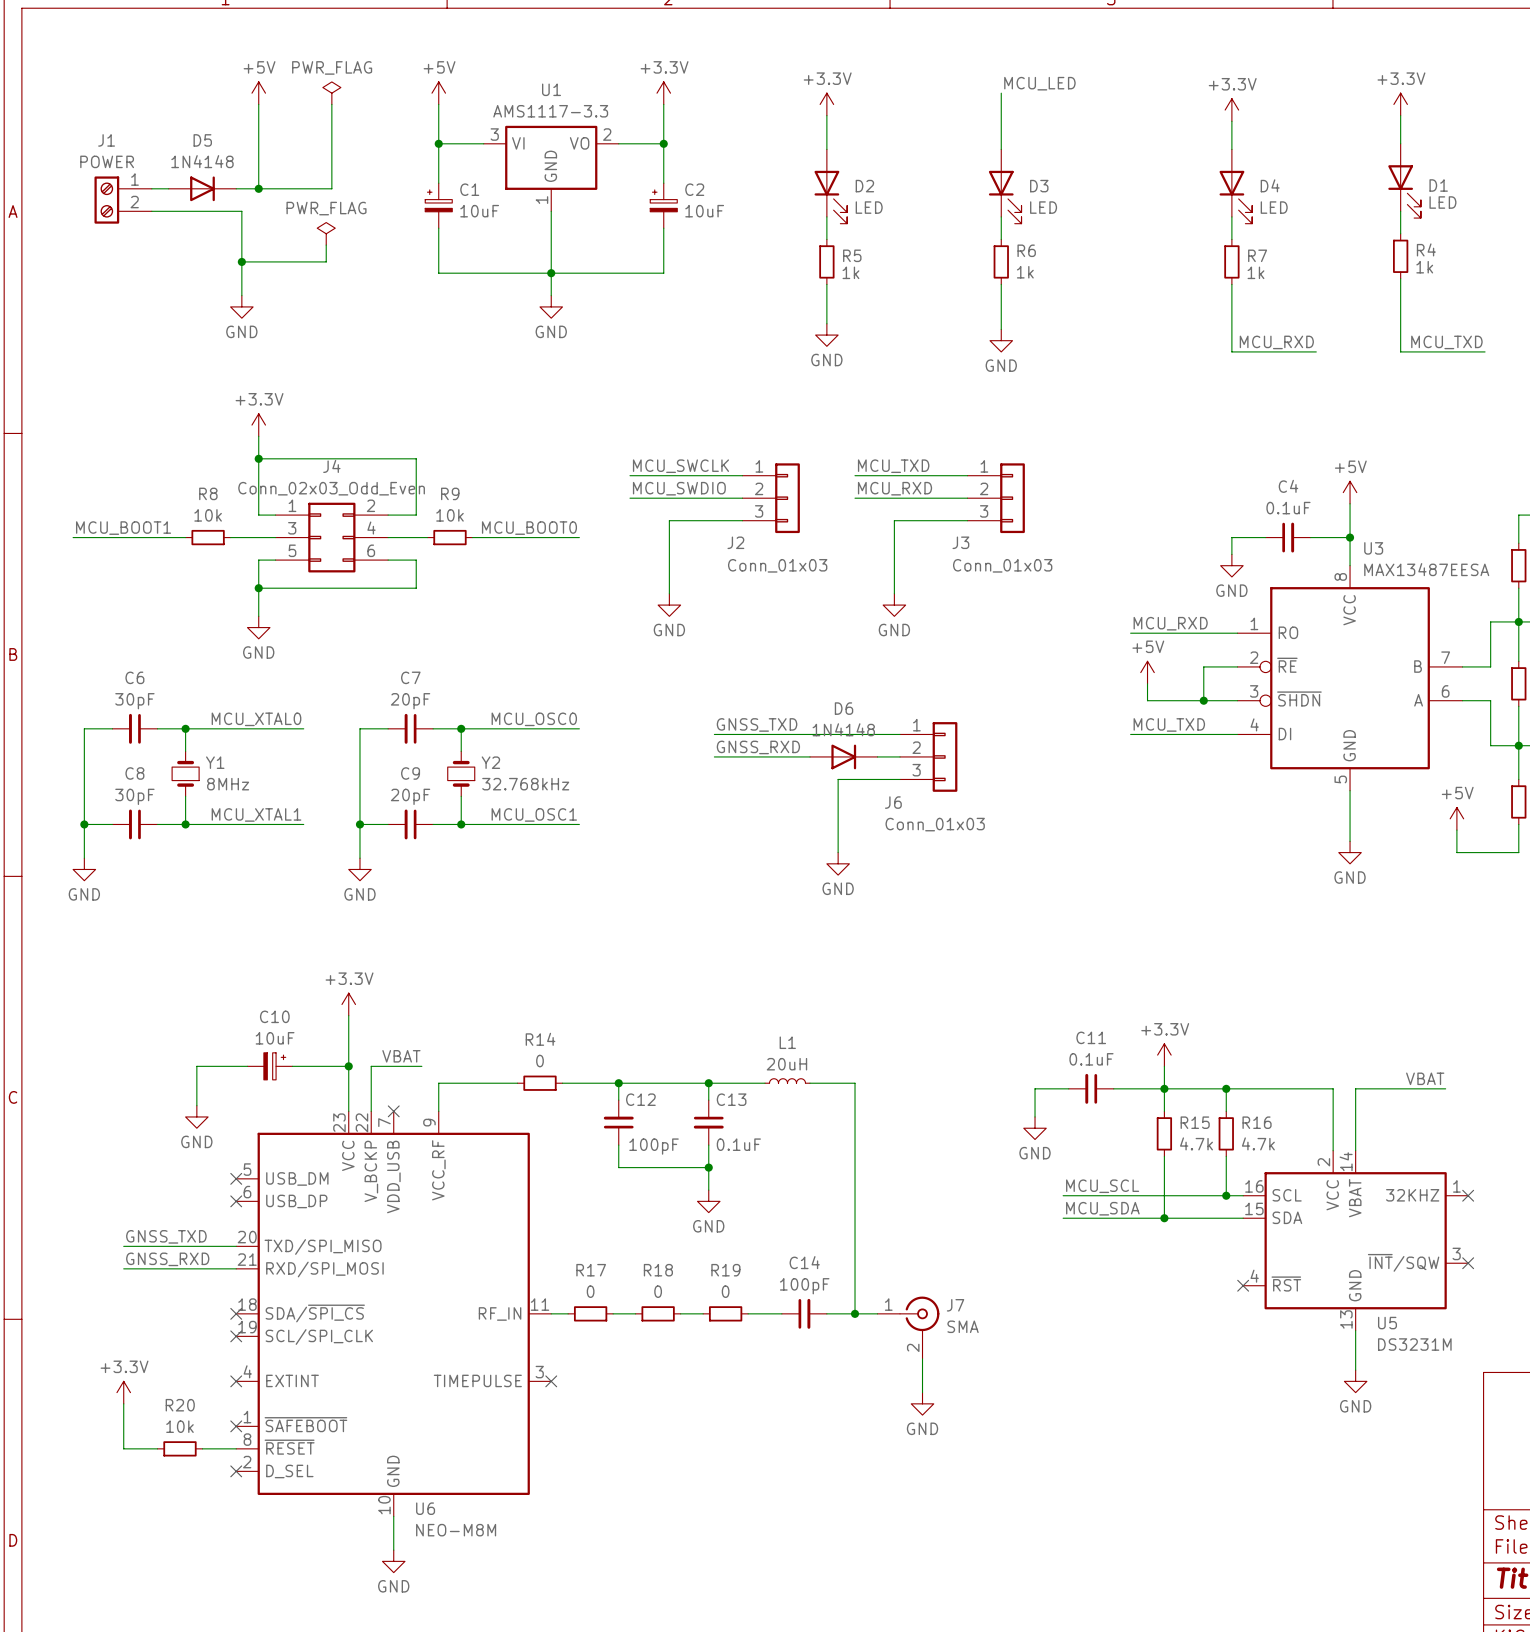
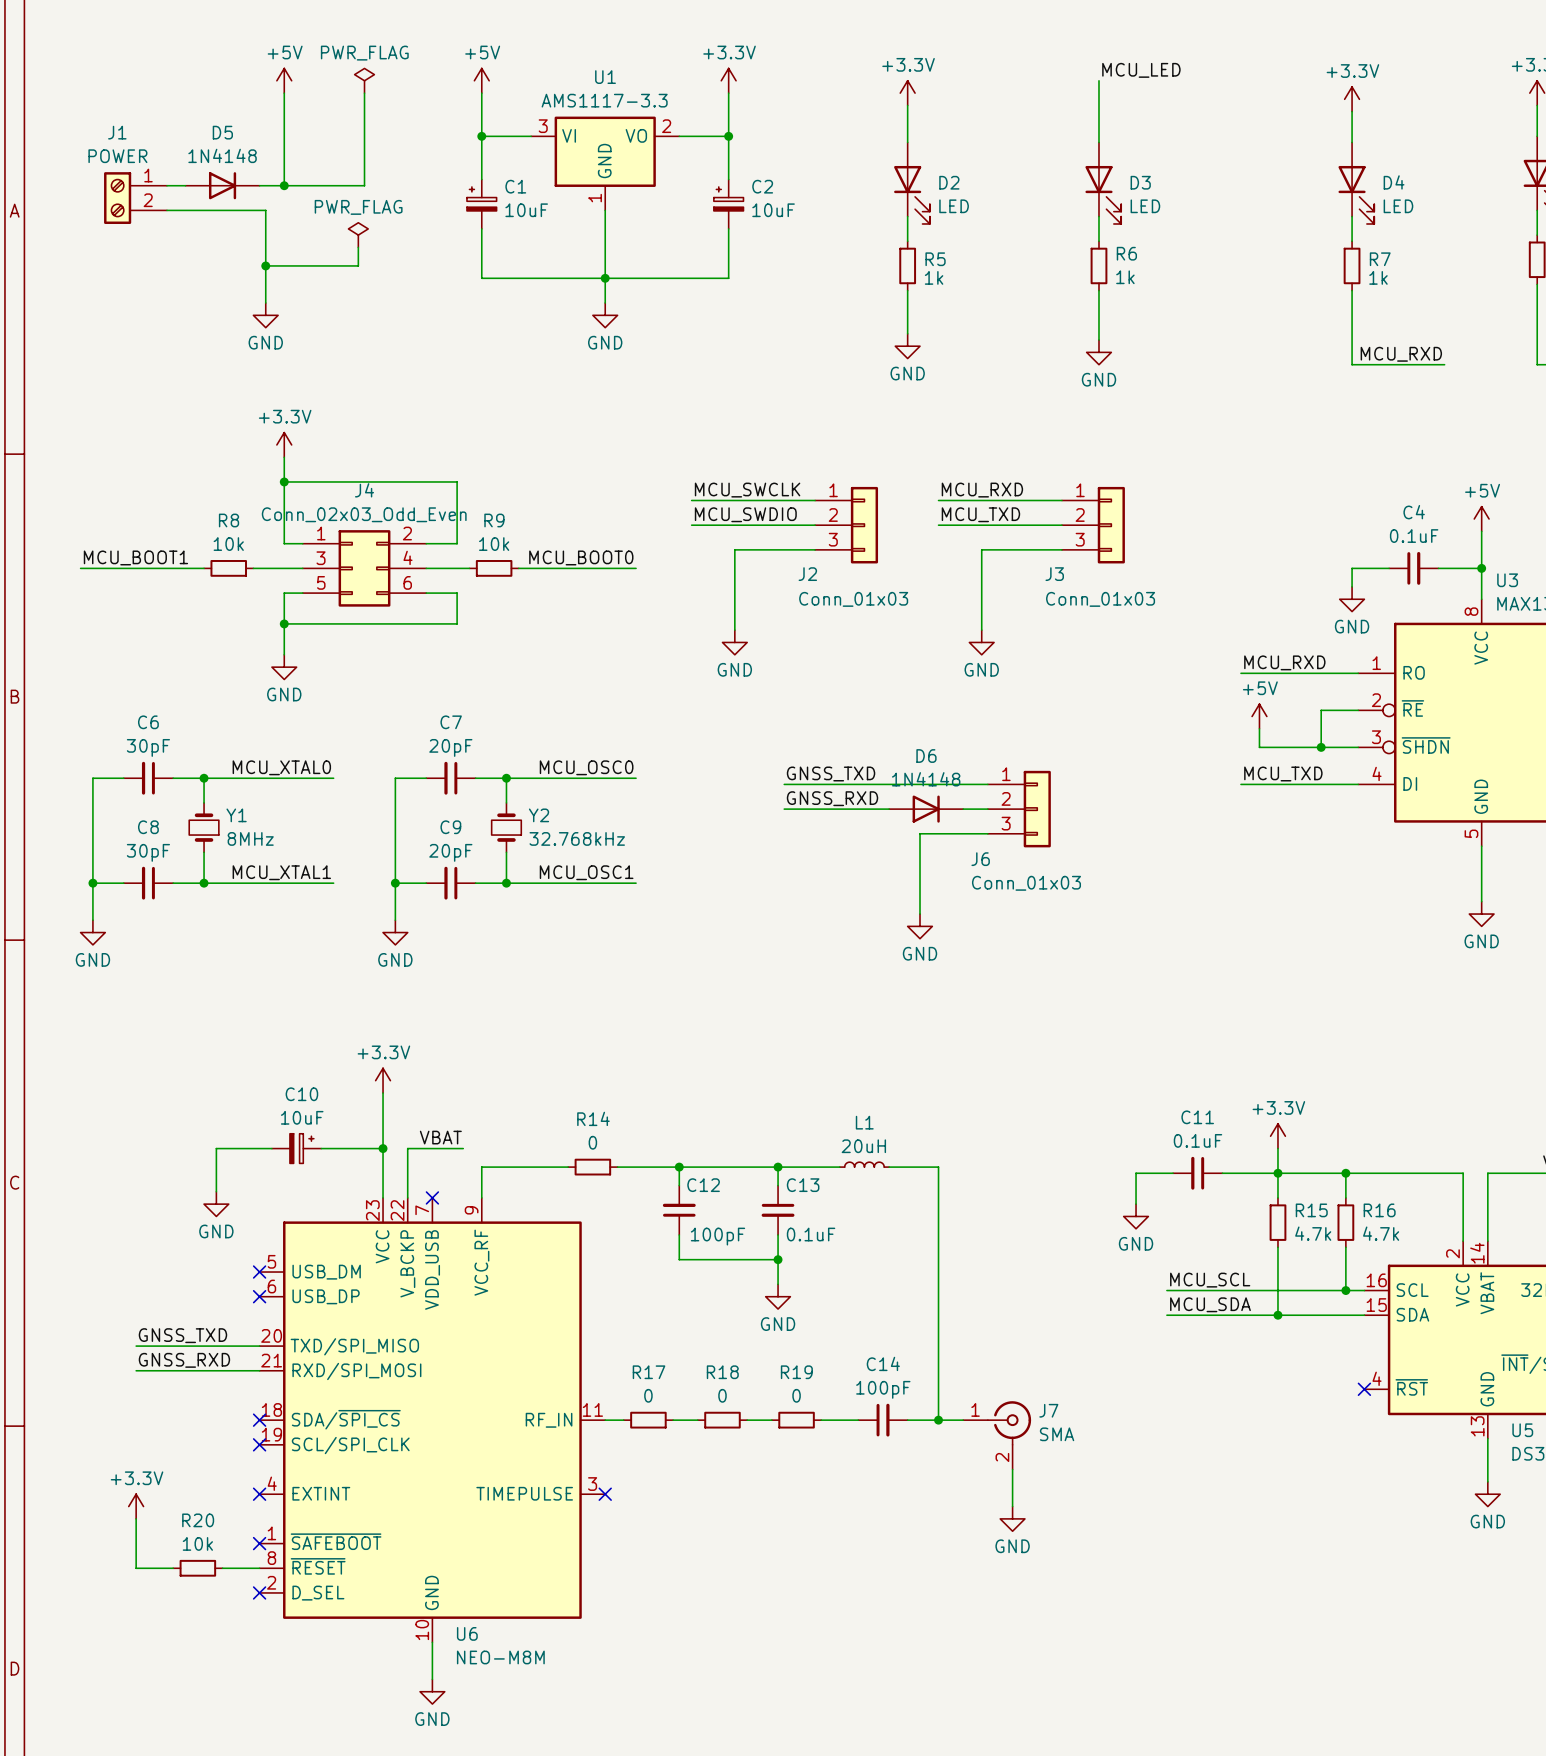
label: MCU_TXD (893, 466) -> MCU_RXD (982, 490)
label: MCU_RXD (895, 488) -> MCU_TXD (980, 514)

